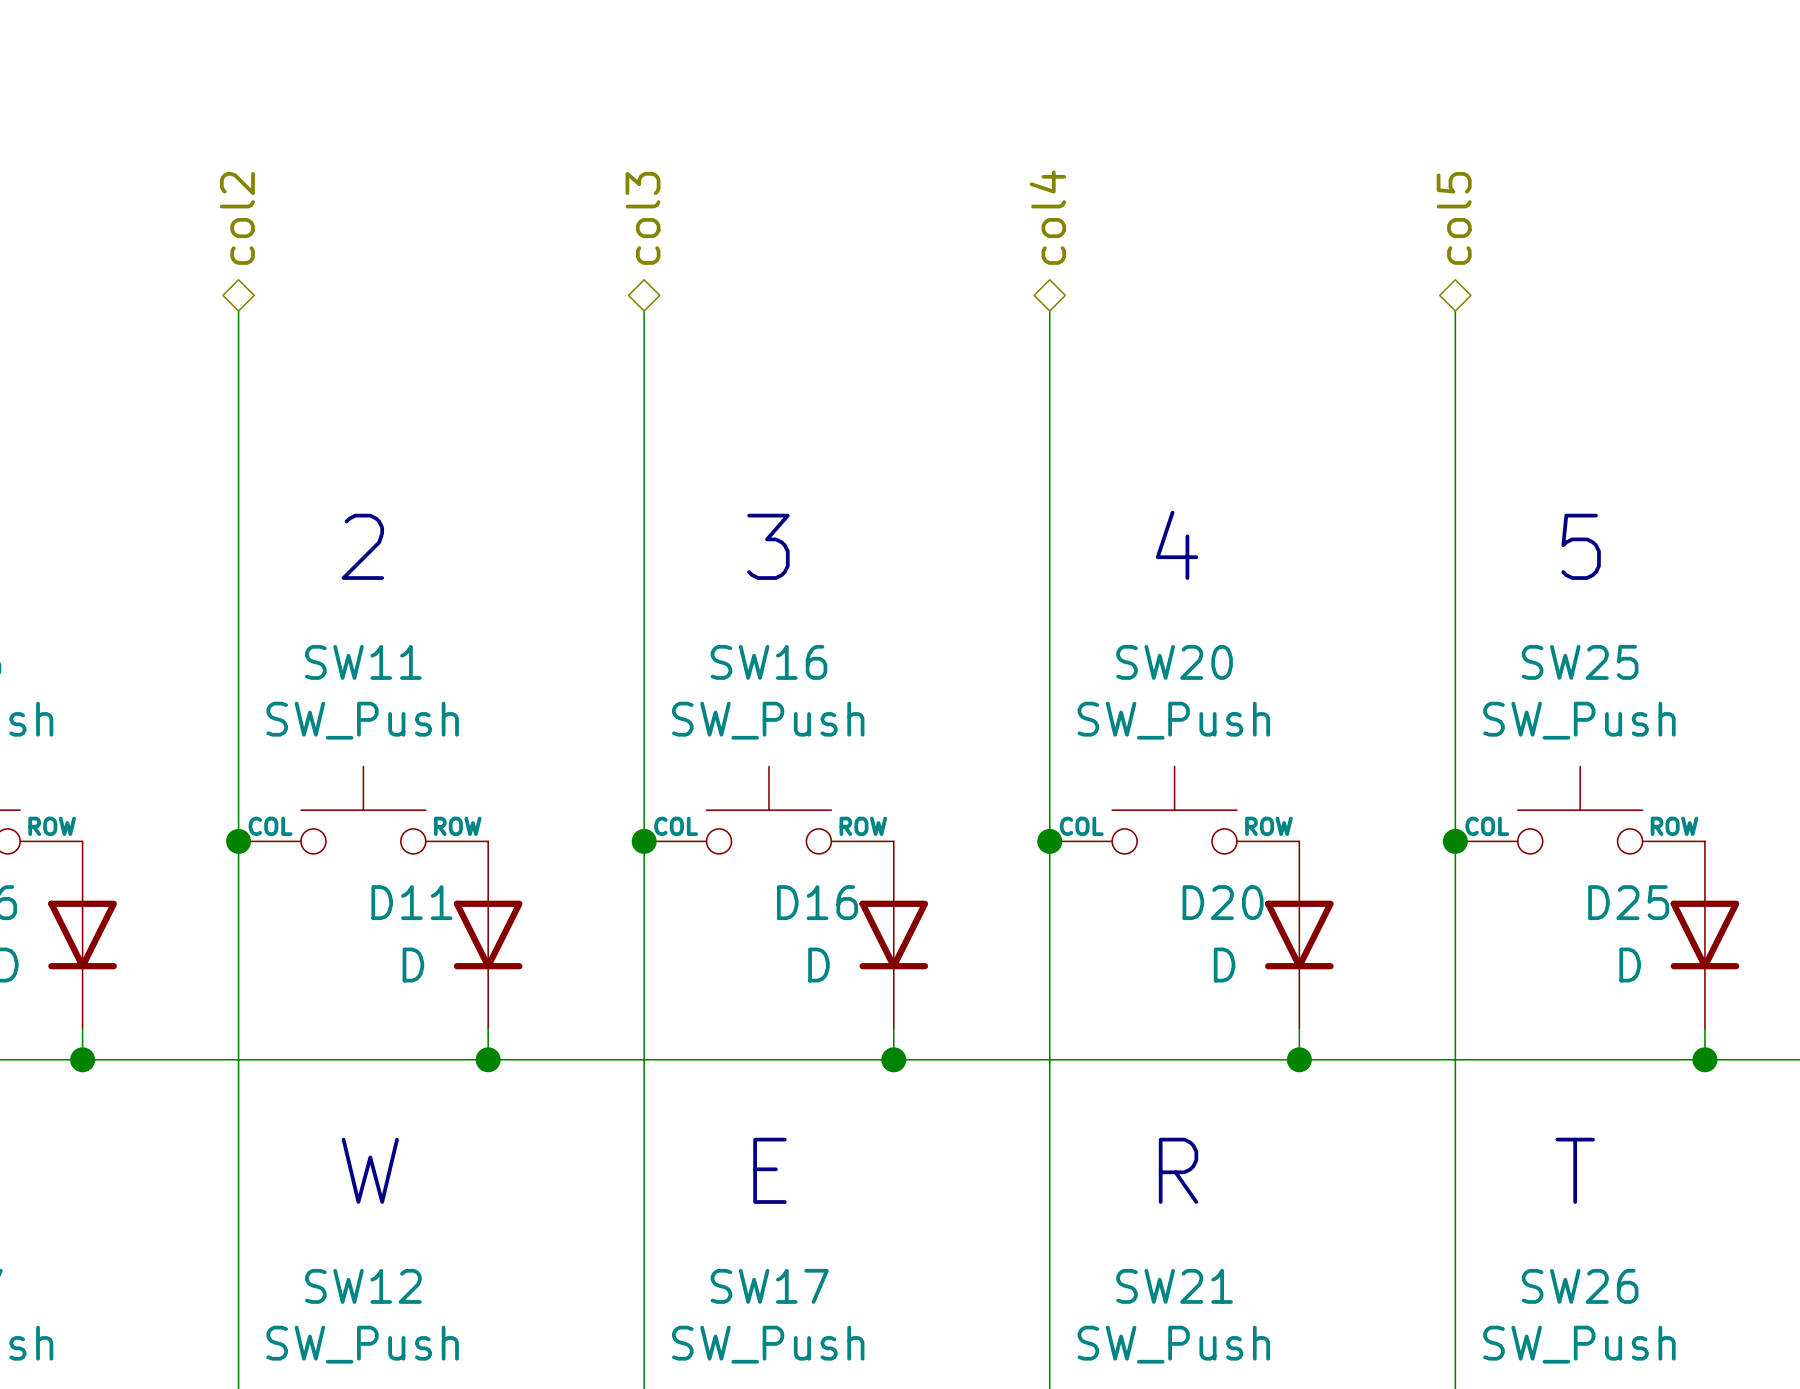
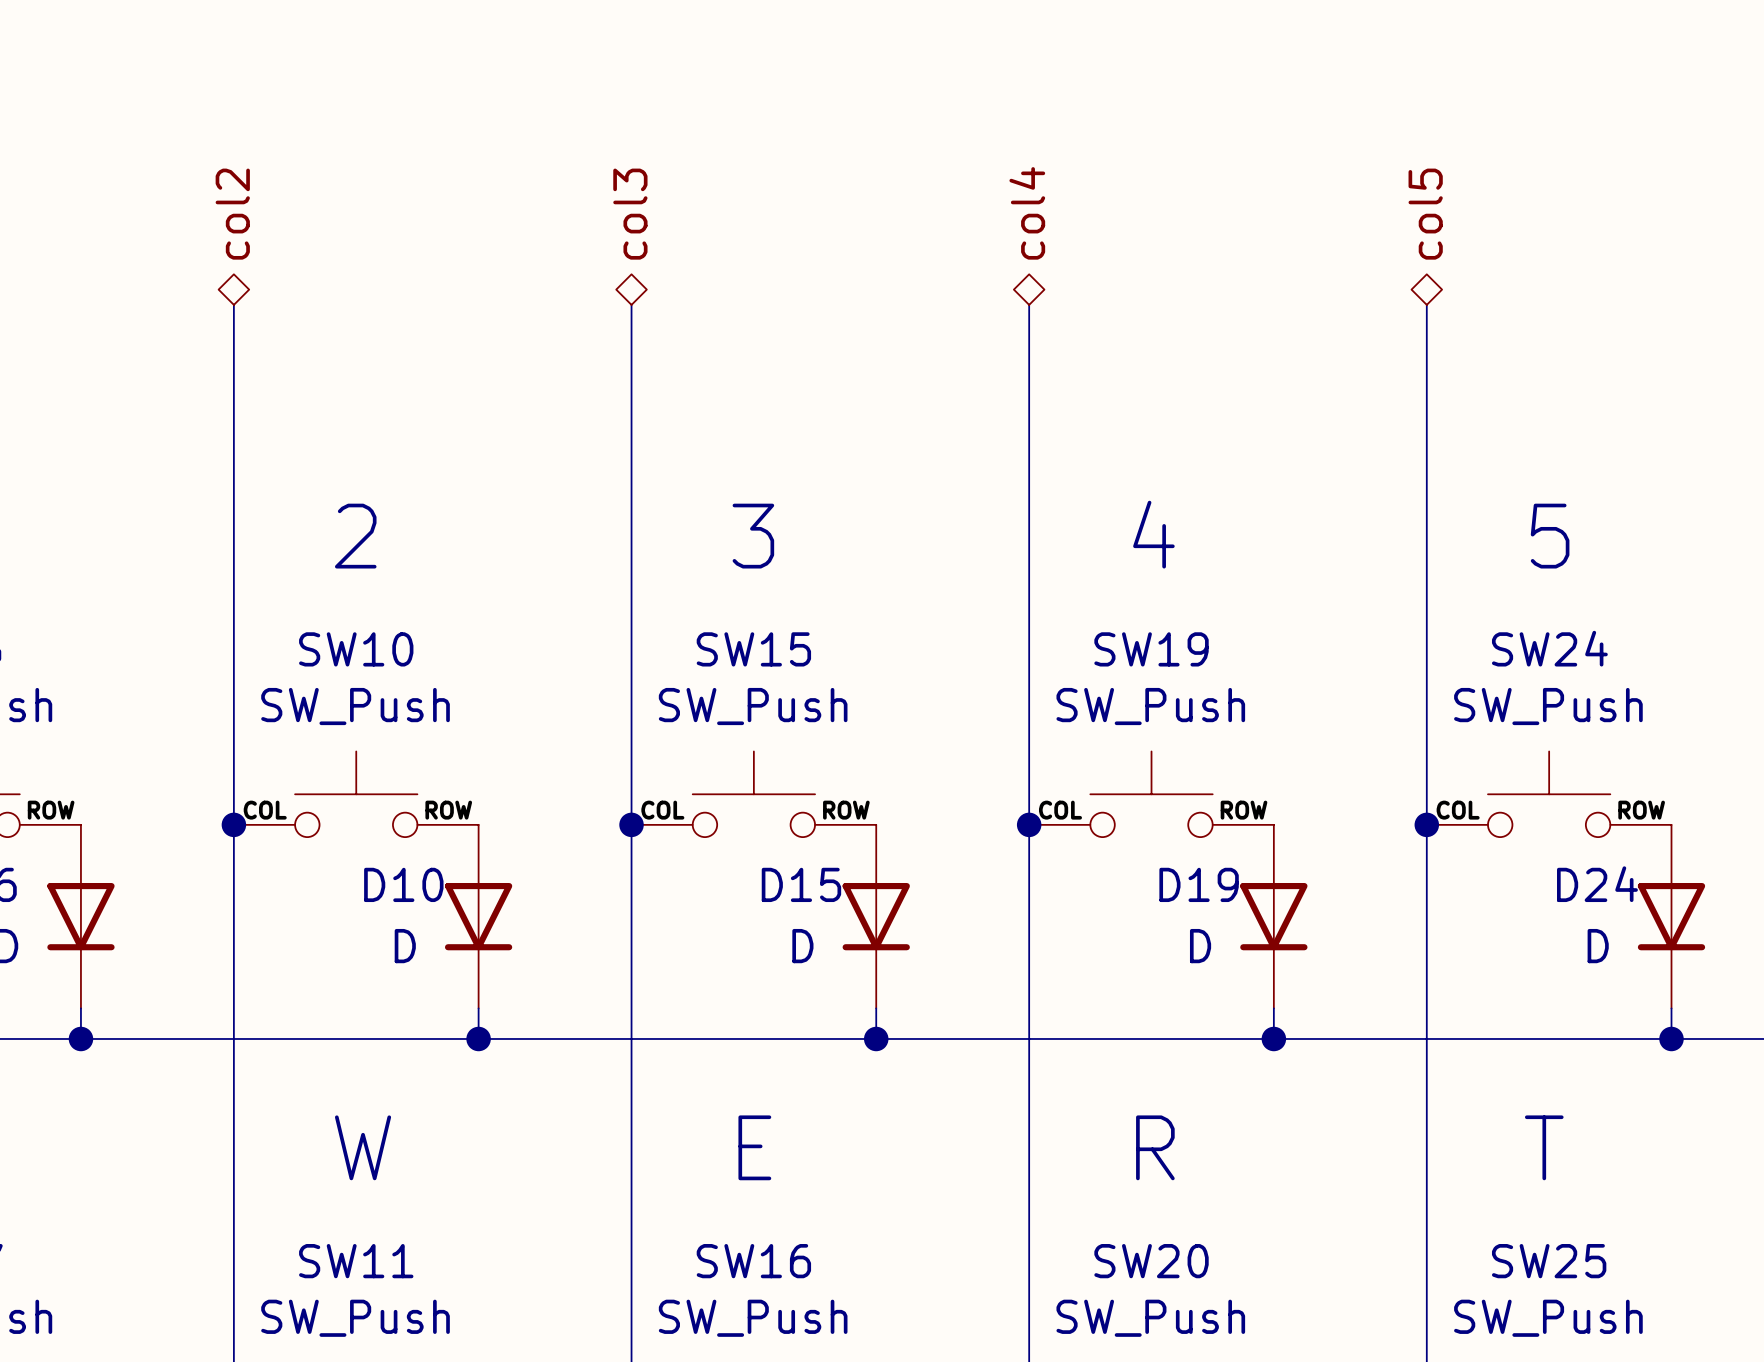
SW11 name: SW11 (363, 662) -> SW10 (356, 649)
SW16 name: SW16 (768, 662) -> SW15 (753, 649)
SW20 name: SW20 (1174, 662) -> SW19 (1151, 649)
SW25 name: SW25 (1580, 662) -> SW24 (1549, 648)
D11 name: D11 (411, 902) -> D10 (403, 884)
D16 name: D16 (817, 902) -> D15 (801, 884)
D20 name: D20 (1223, 902) -> D19 (1199, 884)
D25 name: D25 (1628, 902) -> D24 (1597, 884)
SW12 name: SW12 (363, 1286) -> SW11 (356, 1261)
SW17 name: SW17 (769, 1286) -> SW16 (753, 1261)
SW21 name: SW21 (1174, 1286) -> SW20 (1151, 1261)
SW26 name: SW26 (1580, 1286) -> SW25 (1549, 1261)

